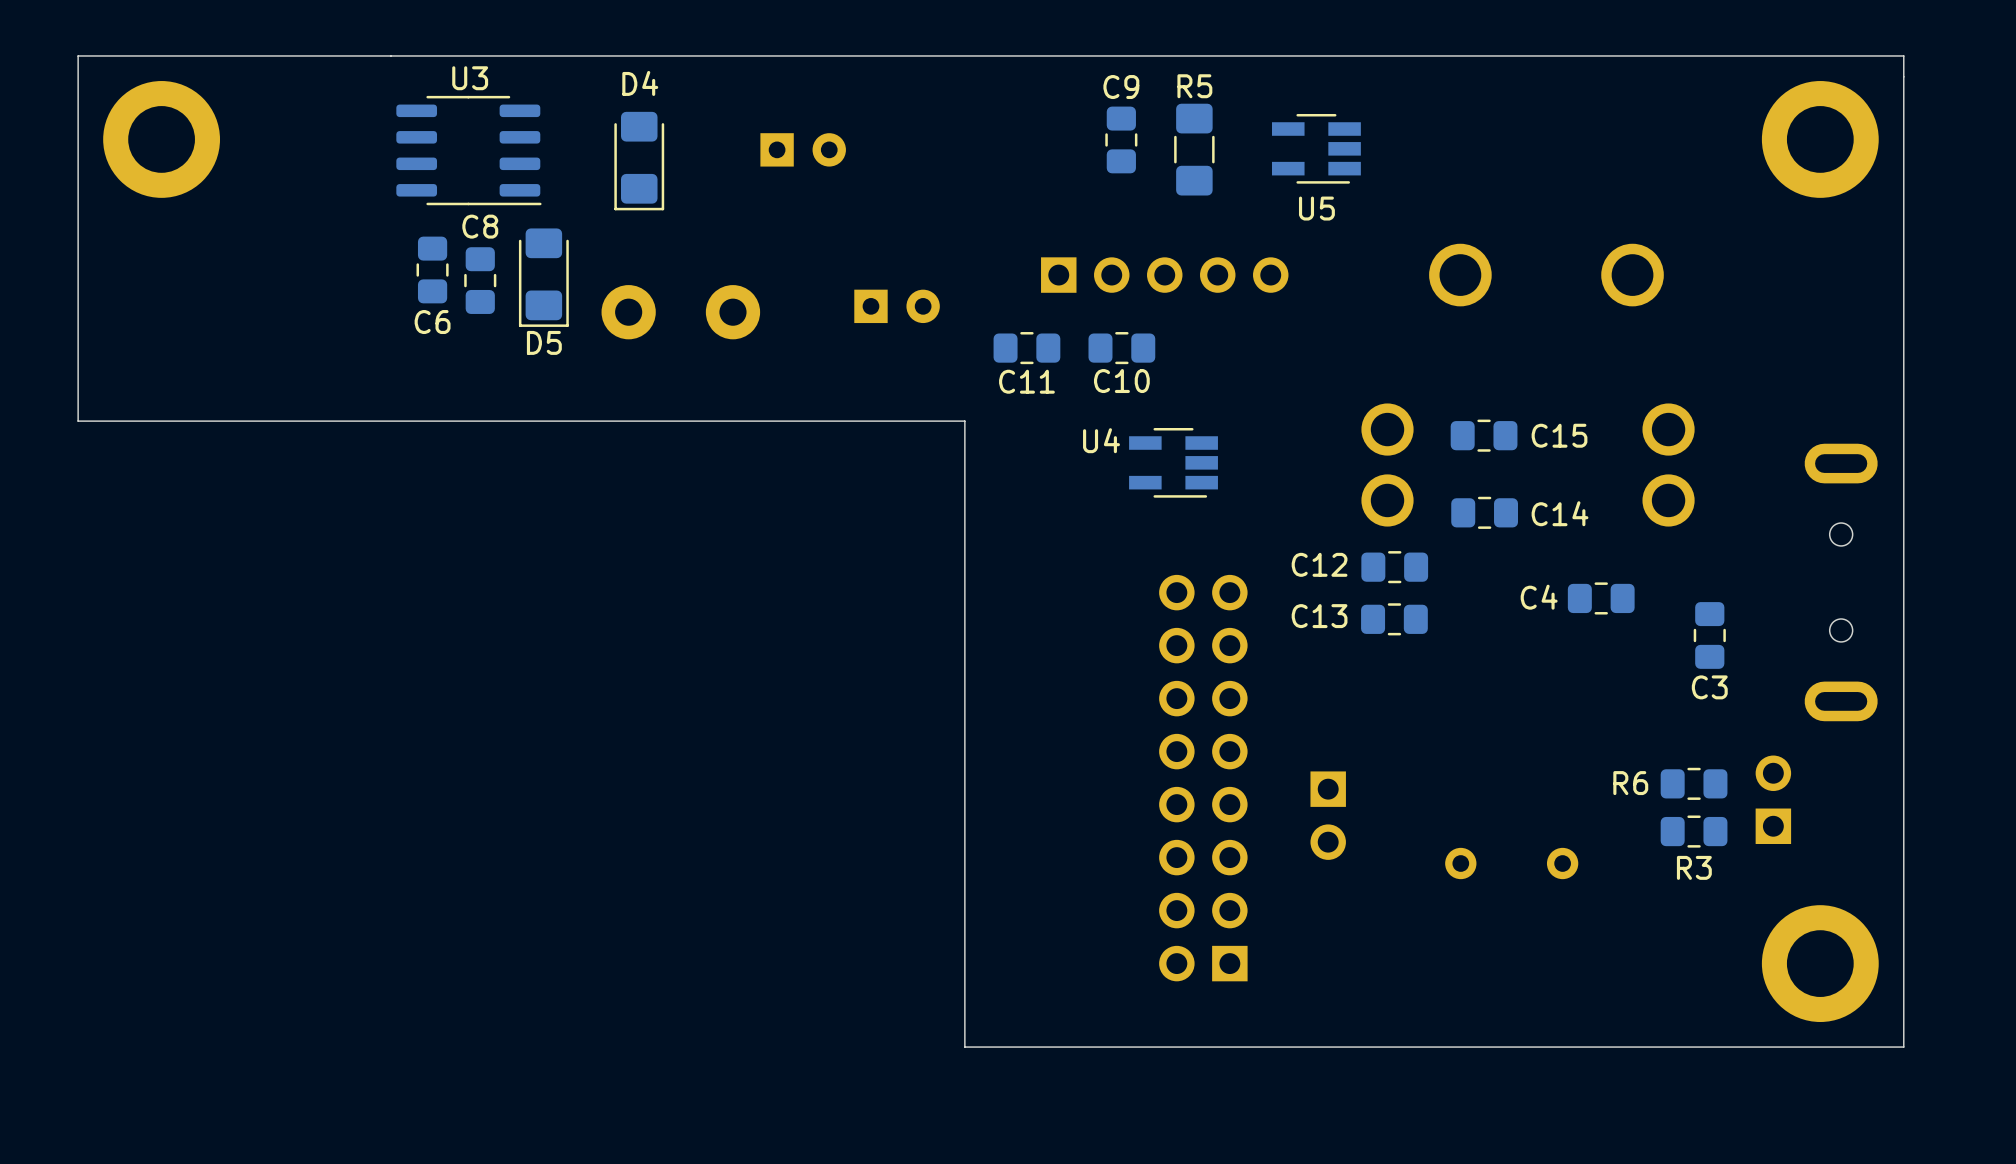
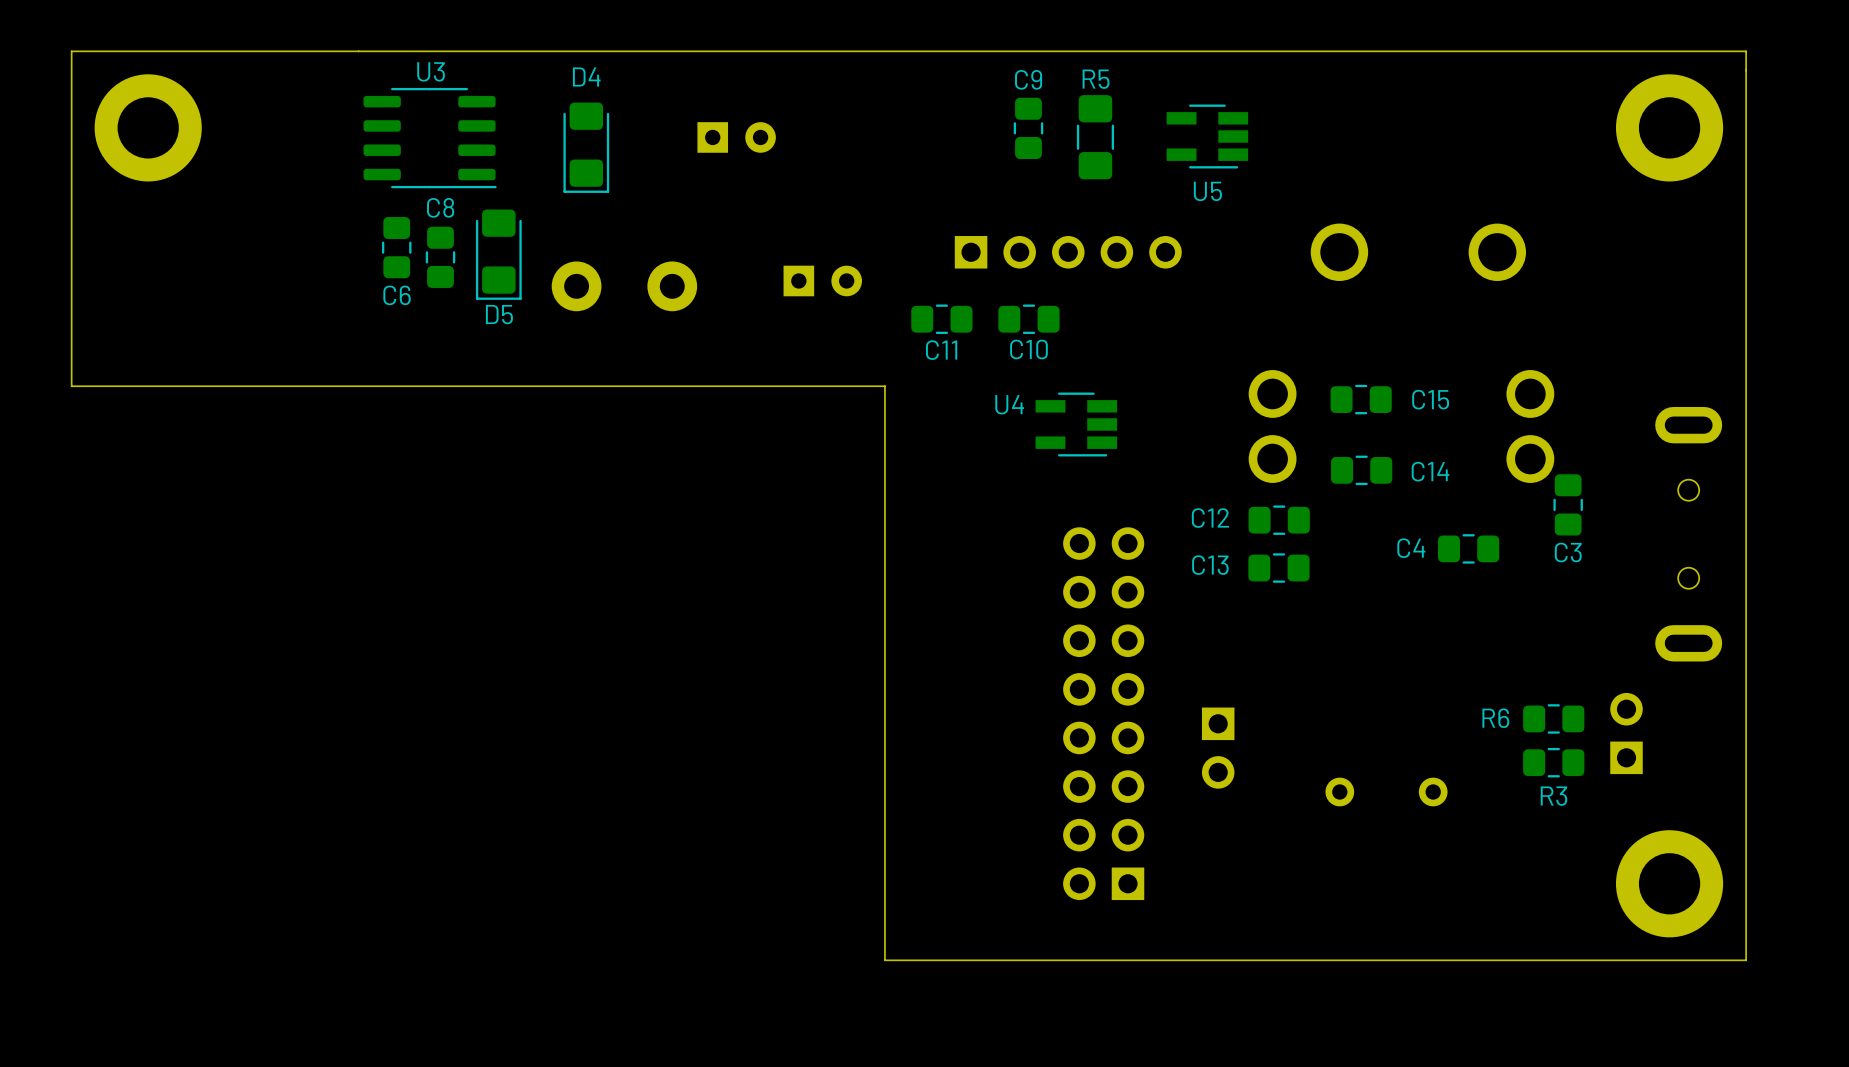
C3 position: (1709, 635) -> (1568, 504)

